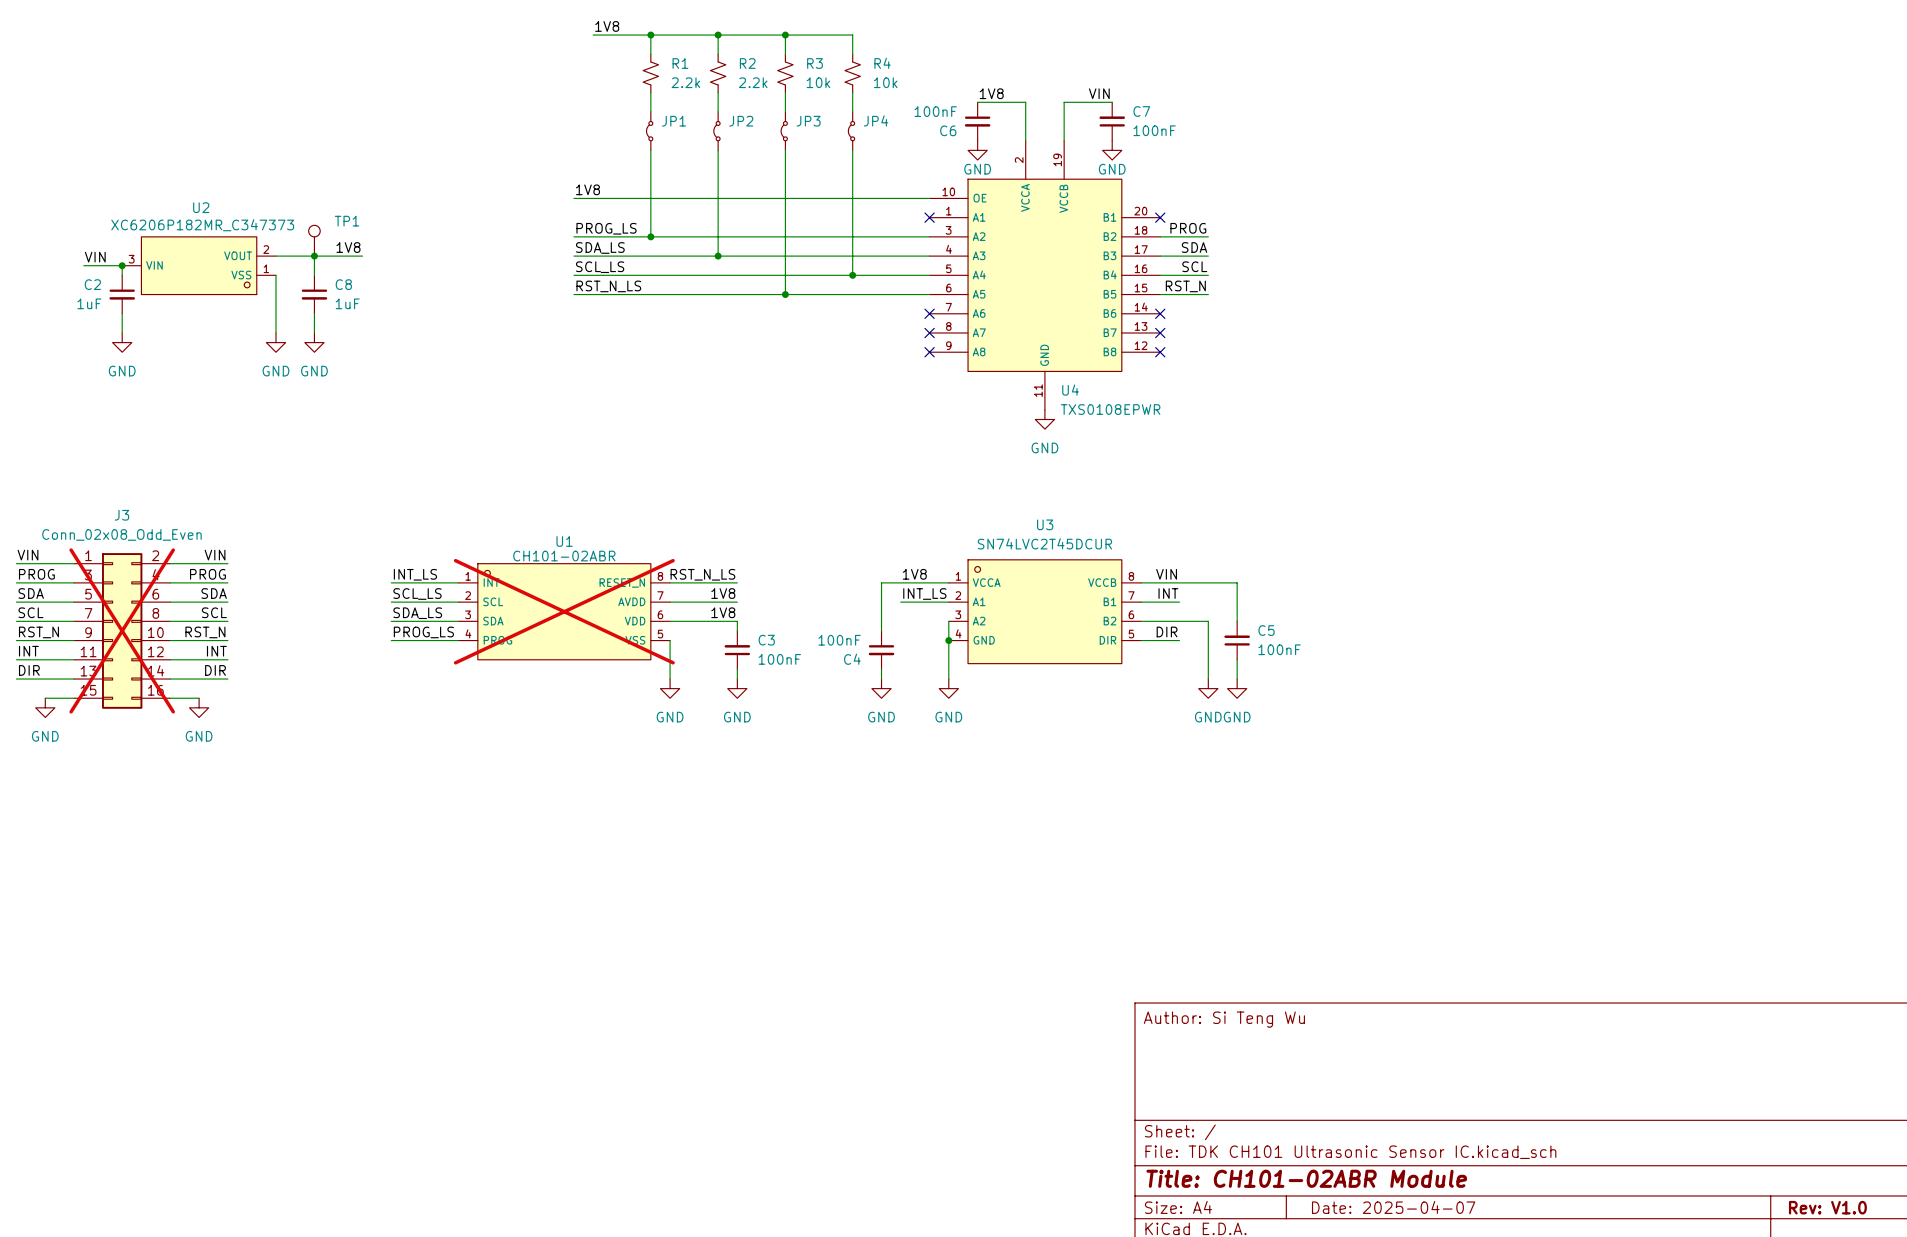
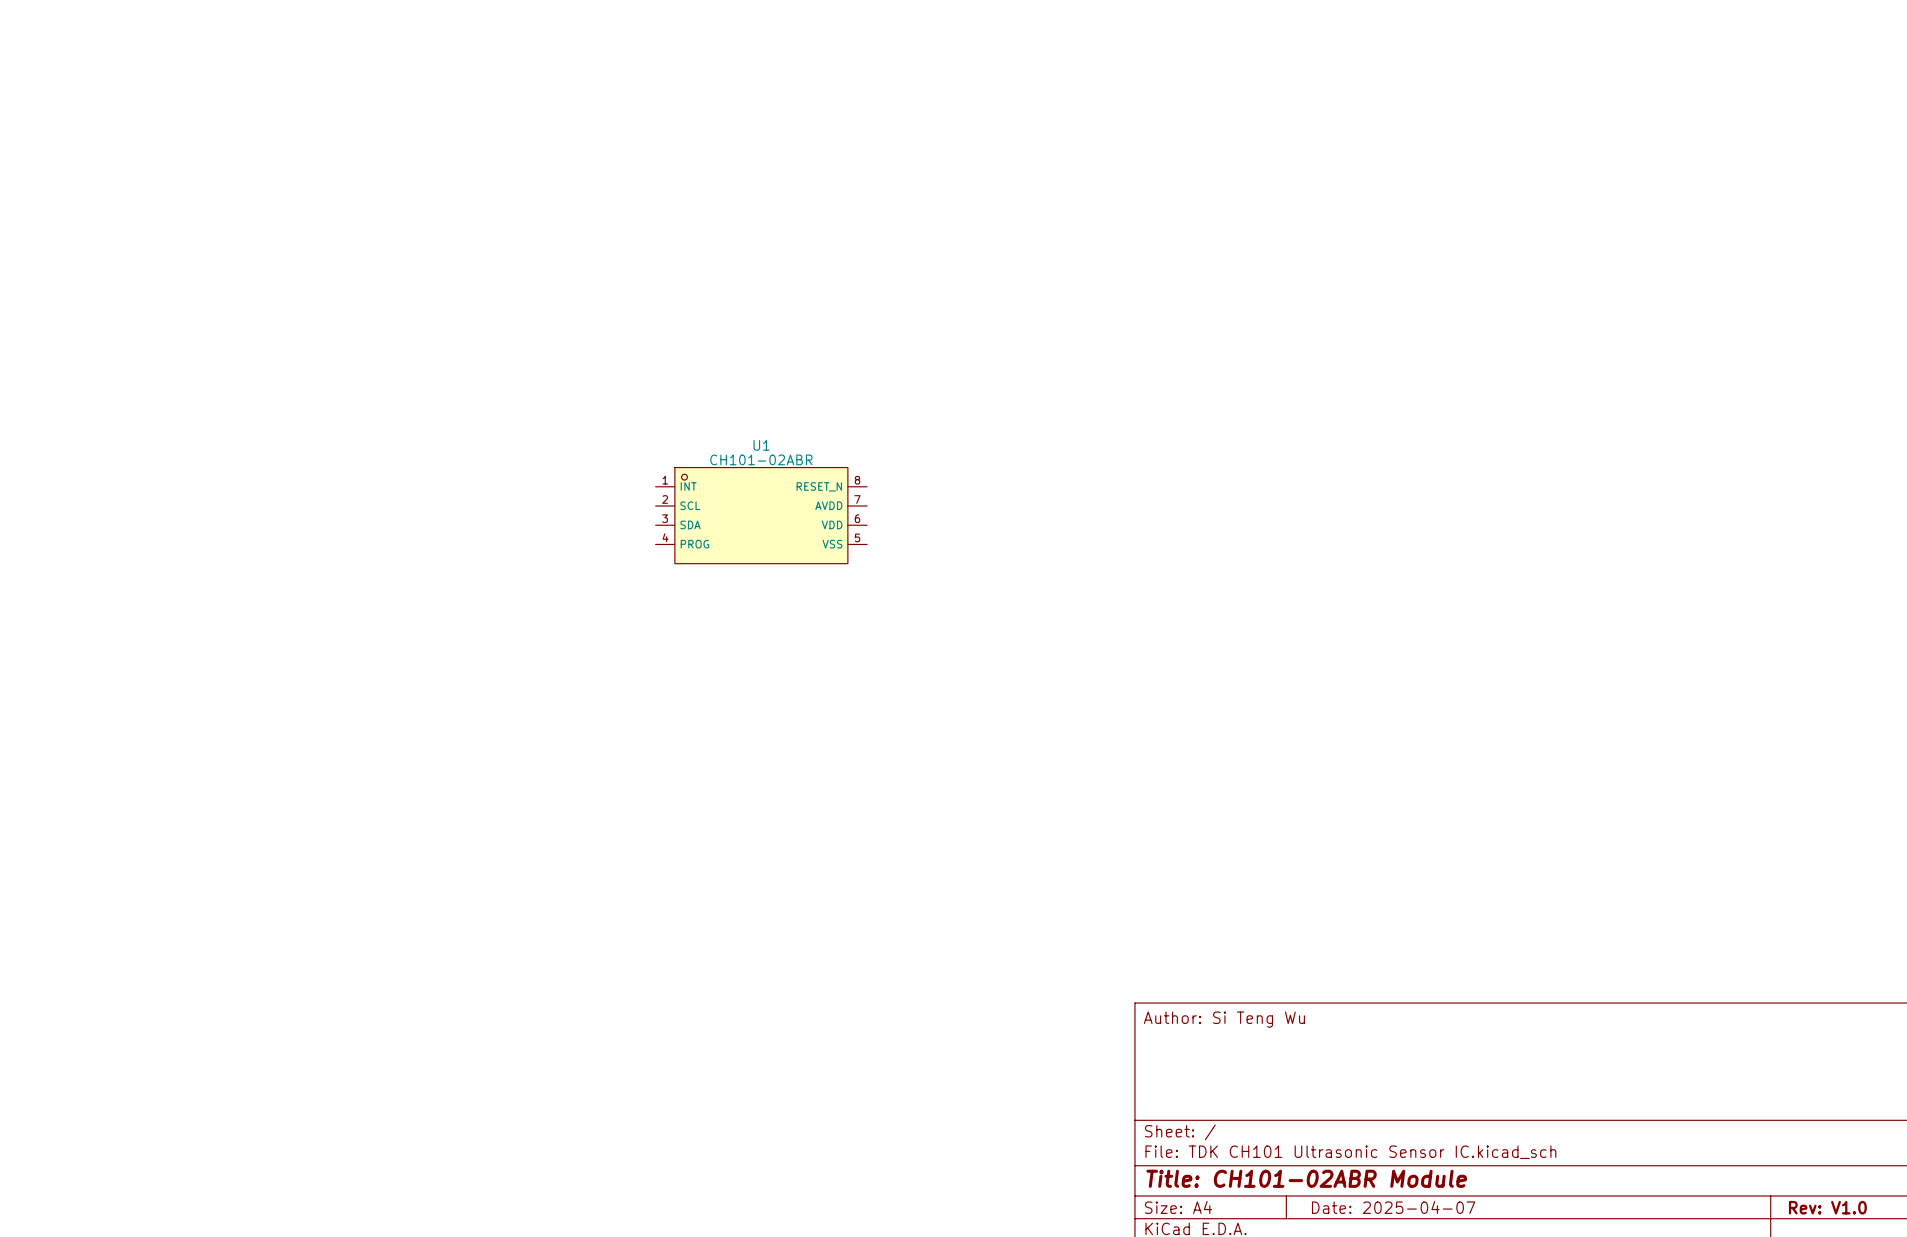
label: 1V8 (607, 26) -> none
wire: (593, 35) (852, 35) (852, 54) -> none
wire: (650, 35) (650, 54) -> none
junction: (650, 35) -> none
wire: (718, 35) (718, 54) -> none
junction: (718, 35) -> none
wire: (785, 35) (785, 54) -> none
junction: (785, 35) -> none
R1: 2.2k (650, 73) -> none
R2: 2.2k (718, 73) -> none
R3: 10k (785, 73) -> none
R4: 10k (852, 73) -> none
wire: (650, 92) (650, 111) -> none
wire: (718, 92) (718, 111) -> none
wire: (785, 92) (785, 111) -> none
wire: (852, 92) (852, 111) -> none
label: 1V8 (991, 93) -> none
label: VIN (1099, 93) -> none
wire: (977, 102) (1025, 102) (1025, 140) -> none
wire: (1112, 102) (1064, 102) (1064, 140) -> none
C6: 100nF (977, 121) -> none
C7: 100nF (1112, 121) -> none
JP1: (649, 131) -> none
JP2: (716, 131) -> none
JP3: (784, 131) -> none
JP4: (851, 131) -> none
wire: (650, 150) (650, 236) -> none
wire: (718, 150) (718, 256) -> none
wire: (785, 150) (785, 294) -> none
wire: (852, 150) (852, 275) -> none
power symbol: GND (977, 150) -> none
power symbol: GND (1112, 150) -> none
label: 1V8 (587, 189) -> none
wire: (573, 198) (929, 198) -> none
no-connect mark: (929, 217) -> none
no-connect mark: (1160, 217) -> none
label: PROG_LS (606, 228) -> none
label: PROG (1188, 228) -> none
wire: (573, 236) (929, 236) -> none
junction: (650, 236) -> none
wire: (1160, 236) (1208, 236) -> none
TP1: (314, 240) -> none
label: 1V8 (348, 247) -> none
label: SDA_LS (600, 247) -> none
label: SDA (1194, 247) -> none
wire: (275, 256) (362, 256) -> none
wire: (314, 256) (314, 275) -> none
junction: (314, 256) -> none
wire: (573, 256) (929, 256) -> none
junction: (718, 256) -> none
wire: (1160, 256) (1208, 256) -> none
label: VIN (95, 257) -> none
wire: (83, 265) (122, 265) (122, 275) -> none
junction: (122, 265) -> none
U2: XC6206P182MR_C347373 (199, 265) -> none
label: SCL (1194, 266) -> none
label: SCL_LS (600, 267) -> none
wire: (275, 275) (275, 332) -> none
wire: (573, 275) (929, 275) -> none
junction: (852, 275) -> none
U4: TXS0108EPWR (1044, 275) -> none
wire: (1160, 275) (1208, 275) -> none
label: RST_N_LS (608, 286) -> none
label: RST_N (1185, 286) -> none
C2: 1uF (122, 294) -> none
C8: 1uF (314, 294) -> none
wire: (573, 294) (929, 294) -> none
junction: (785, 294) -> none
wire: (1160, 294) (1208, 294) -> none
wire: (122, 313) (122, 332) -> none
wire: (314, 313) (314, 332) -> none
no-connect mark: (929, 313) -> none
no-connect mark: (1160, 313) -> none
no-connect mark: (929, 332) -> none
no-connect mark: (1160, 332) -> none
power symbol: GND (122, 342) -> none
power symbol: GND (275, 342) -> none
power symbol: GND (314, 342) -> none
no-connect mark: (929, 352) -> none
no-connect mark: (1160, 352) -> none
power symbol: GND (1044, 419) -> none
label: VIN (27, 555) -> none
label: VIN (215, 555) -> none
wire: (16, 563) (74, 563) -> none
wire: (170, 563) (227, 563) -> none
label: PROG (36, 574) -> none
label: PROG (207, 574) -> none
label: INT_LS (415, 574) -> none
label: RST_N_LS (702, 574) -> none
label: 1V8 (914, 574) -> none
label: VIN (1166, 574) -> none
wire: (16, 582) (74, 582) -> none
wire: (170, 582) (227, 582) -> none
wire: (391, 582) (458, 582) -> none
wire: (670, 582) (737, 582) -> none
wire: (948, 582) (881, 582) (881, 630) -> none
wire: (1141, 582) (1237, 582) (1237, 621) -> none
label: SDA (31, 593) -> none
label: SDA (214, 593) -> none
label: 1V8 (723, 593) -> none
label: INT (1168, 593) -> none
label: SCL_LS (417, 594) -> none
label: INT_LS (924, 594) -> none
wire: (16, 602) (74, 602) -> none
wire: (170, 602) (227, 602) -> none
wire: (391, 602) (458, 602) -> none
wire: (670, 602) (737, 602) -> none
wire: (900, 602) (948, 602) -> none
wire: (1141, 602) (1179, 602) -> none
U1 position: (564, 611) -> (761, 515)
U1 do-not-place cross: (564, 611) -> none
U3: SN74LVC2T45DCUR (1044, 611) -> none
label: SCL (30, 612) -> none
label: SCL (214, 612) -> none
label: 1V8 (723, 612) -> none
label: SDA_LS (417, 613) -> none
wire: (16, 621) (74, 621) -> none
wire: (170, 621) (227, 621) -> none
wire: (391, 621) (458, 621) -> none
wire: (670, 621) (737, 621) (737, 630) -> none
wire: (948, 621) (948, 679) -> none
wire: (1141, 621) (1208, 621) (1208, 679) -> none
J3: Conn_02x08_Odd_Even (122, 630) -> none
label: DIR (1167, 631) -> none
label: RST_N (38, 632) -> none
label: RST_N (205, 632) -> none
label: PROG_LS (423, 632) -> none
wire: (16, 640) (74, 640) -> none
wire: (170, 640) (227, 640) -> none
wire: (391, 640) (458, 640) -> none
wire: (670, 640) (670, 679) -> none
junction: (948, 640) -> none
wire: (1141, 640) (1179, 640) -> none
C5: 100nF (1237, 640) -> none
C3: 100nF (737, 650) -> none
C4: 100nF (881, 650) -> none
label: INT (28, 651) -> none
label: INT (216, 651) -> none
wire: (16, 659) (74, 659) -> none
wire: (170, 659) (227, 659) -> none
wire: (1237, 659) (1237, 679) -> none
wire: (737, 669) (737, 679) -> none
wire: (881, 669) (881, 679) -> none
label: DIR (29, 670) -> none
label: DIR (215, 670) -> none
wire: (16, 679) (74, 679) -> none
wire: (170, 679) (227, 679) -> none
power symbol: GND (670, 688) -> none
power symbol: GND (737, 688) -> none
power symbol: GND (881, 688) -> none
power symbol: GND (948, 688) -> none
power symbol: GND (1208, 688) -> none
power symbol: GND (1237, 688) -> none
wire: (45, 698) (74, 698) -> none
wire: (170, 698) (199, 698) -> none
power symbol: GND (45, 707) -> none
power symbol: GND (199, 707) -> none

